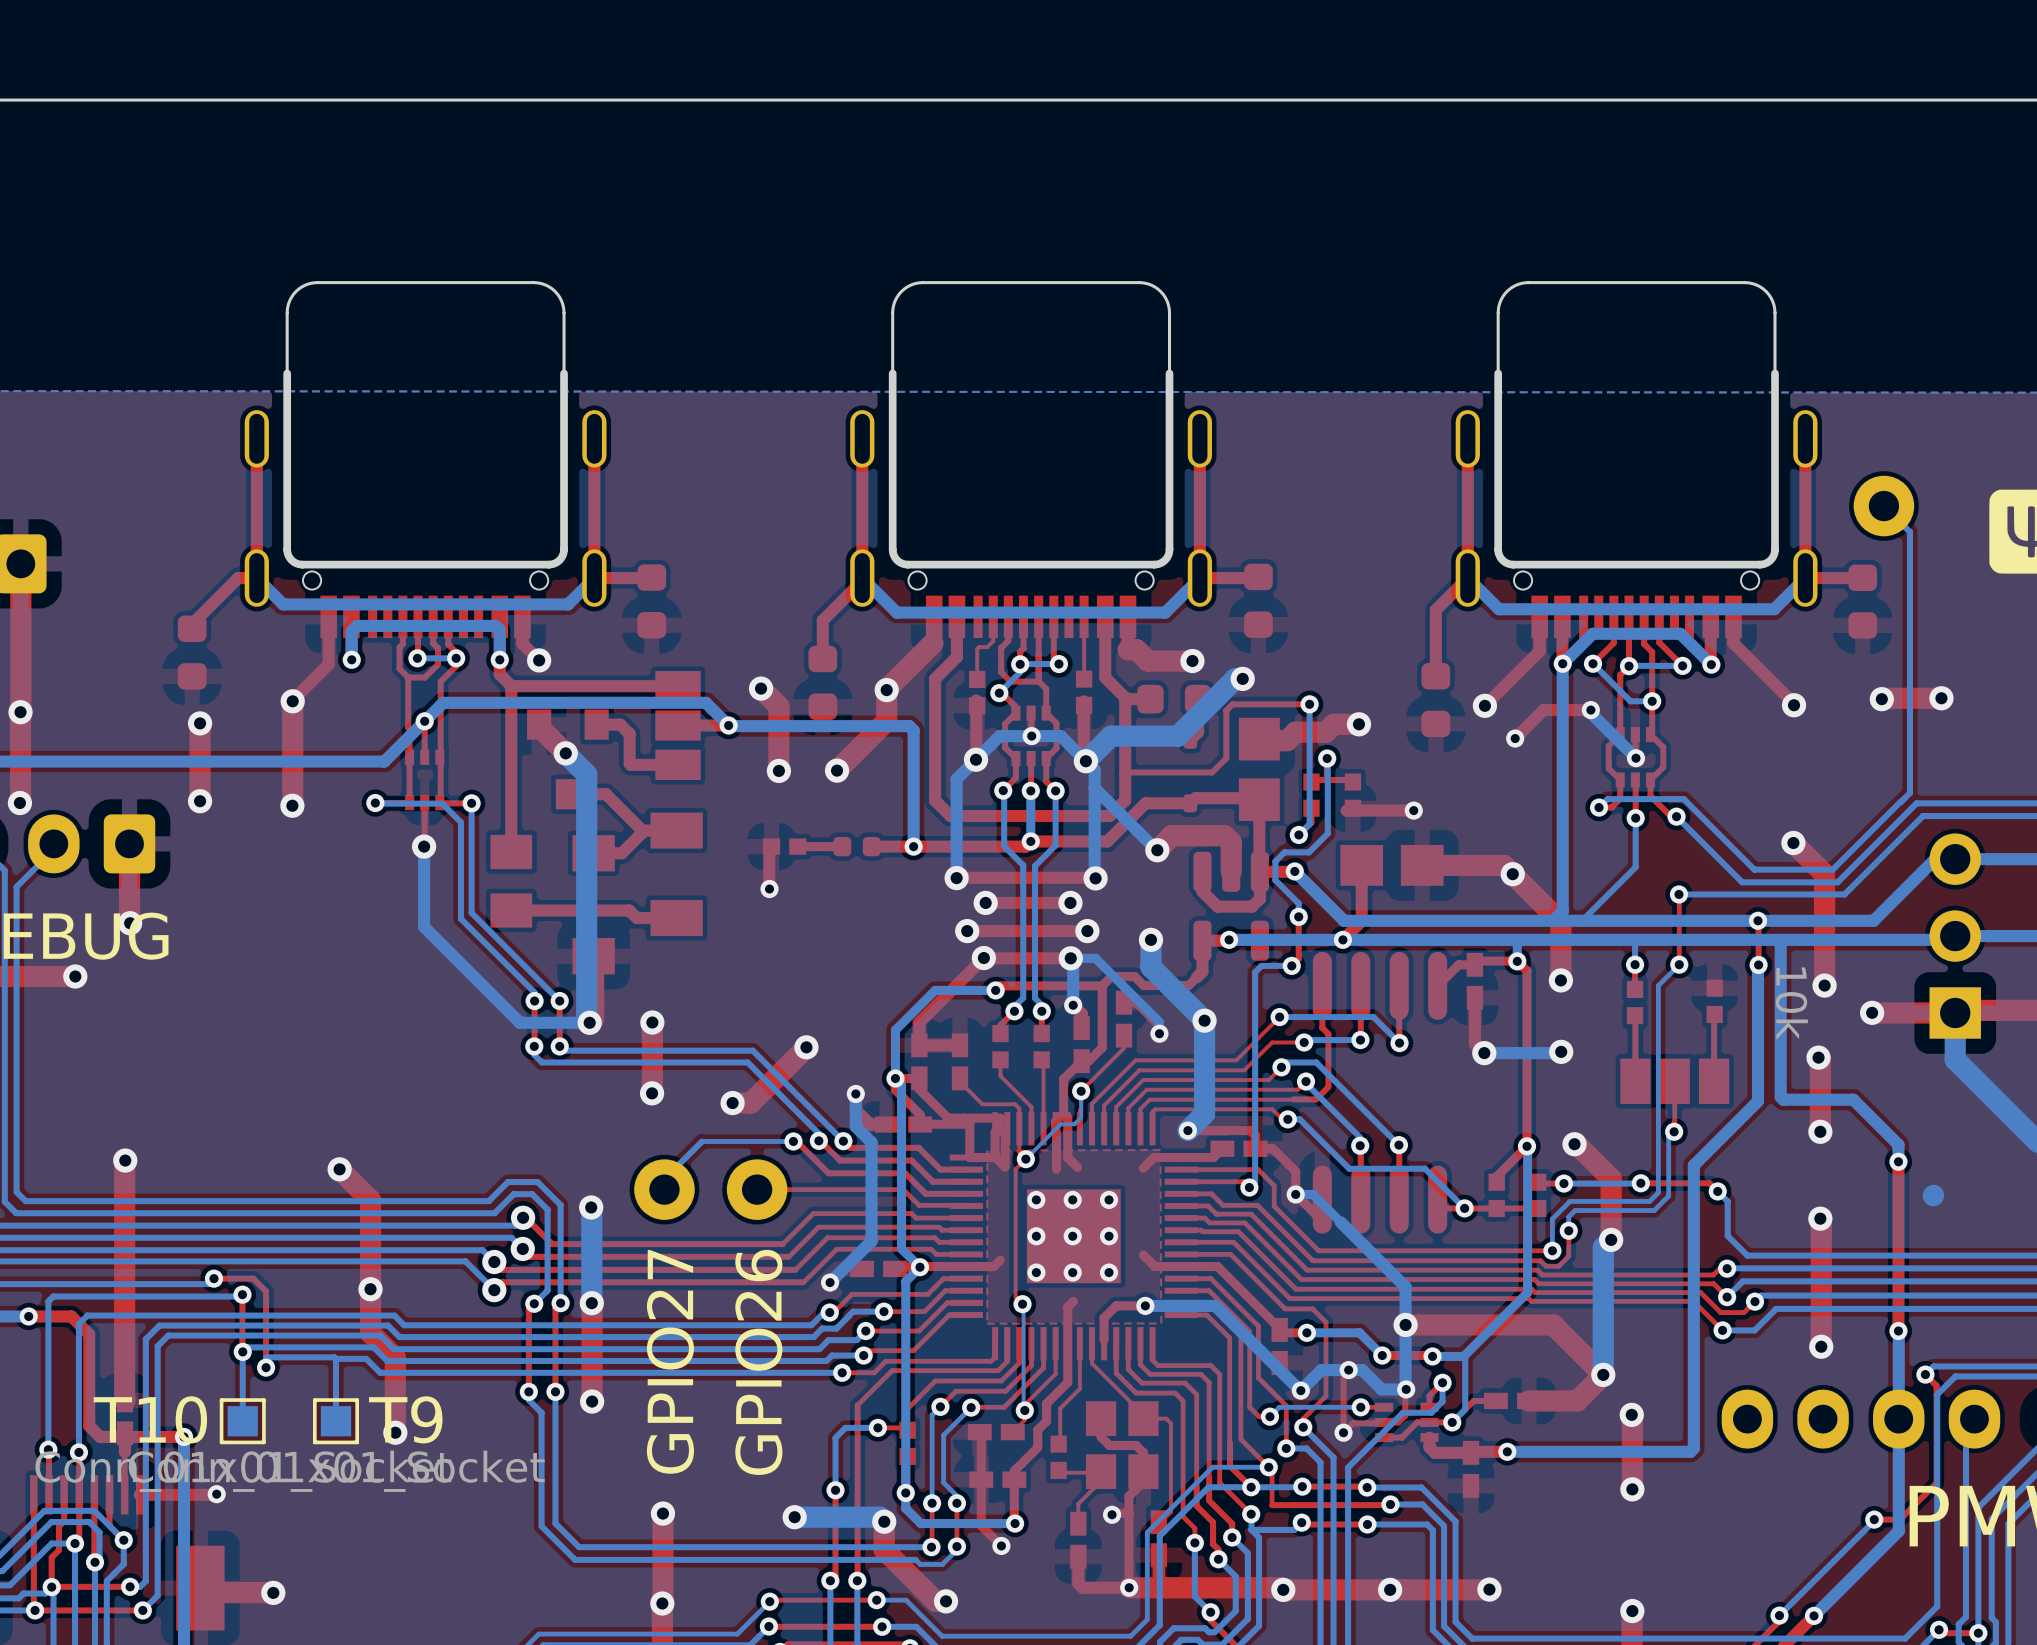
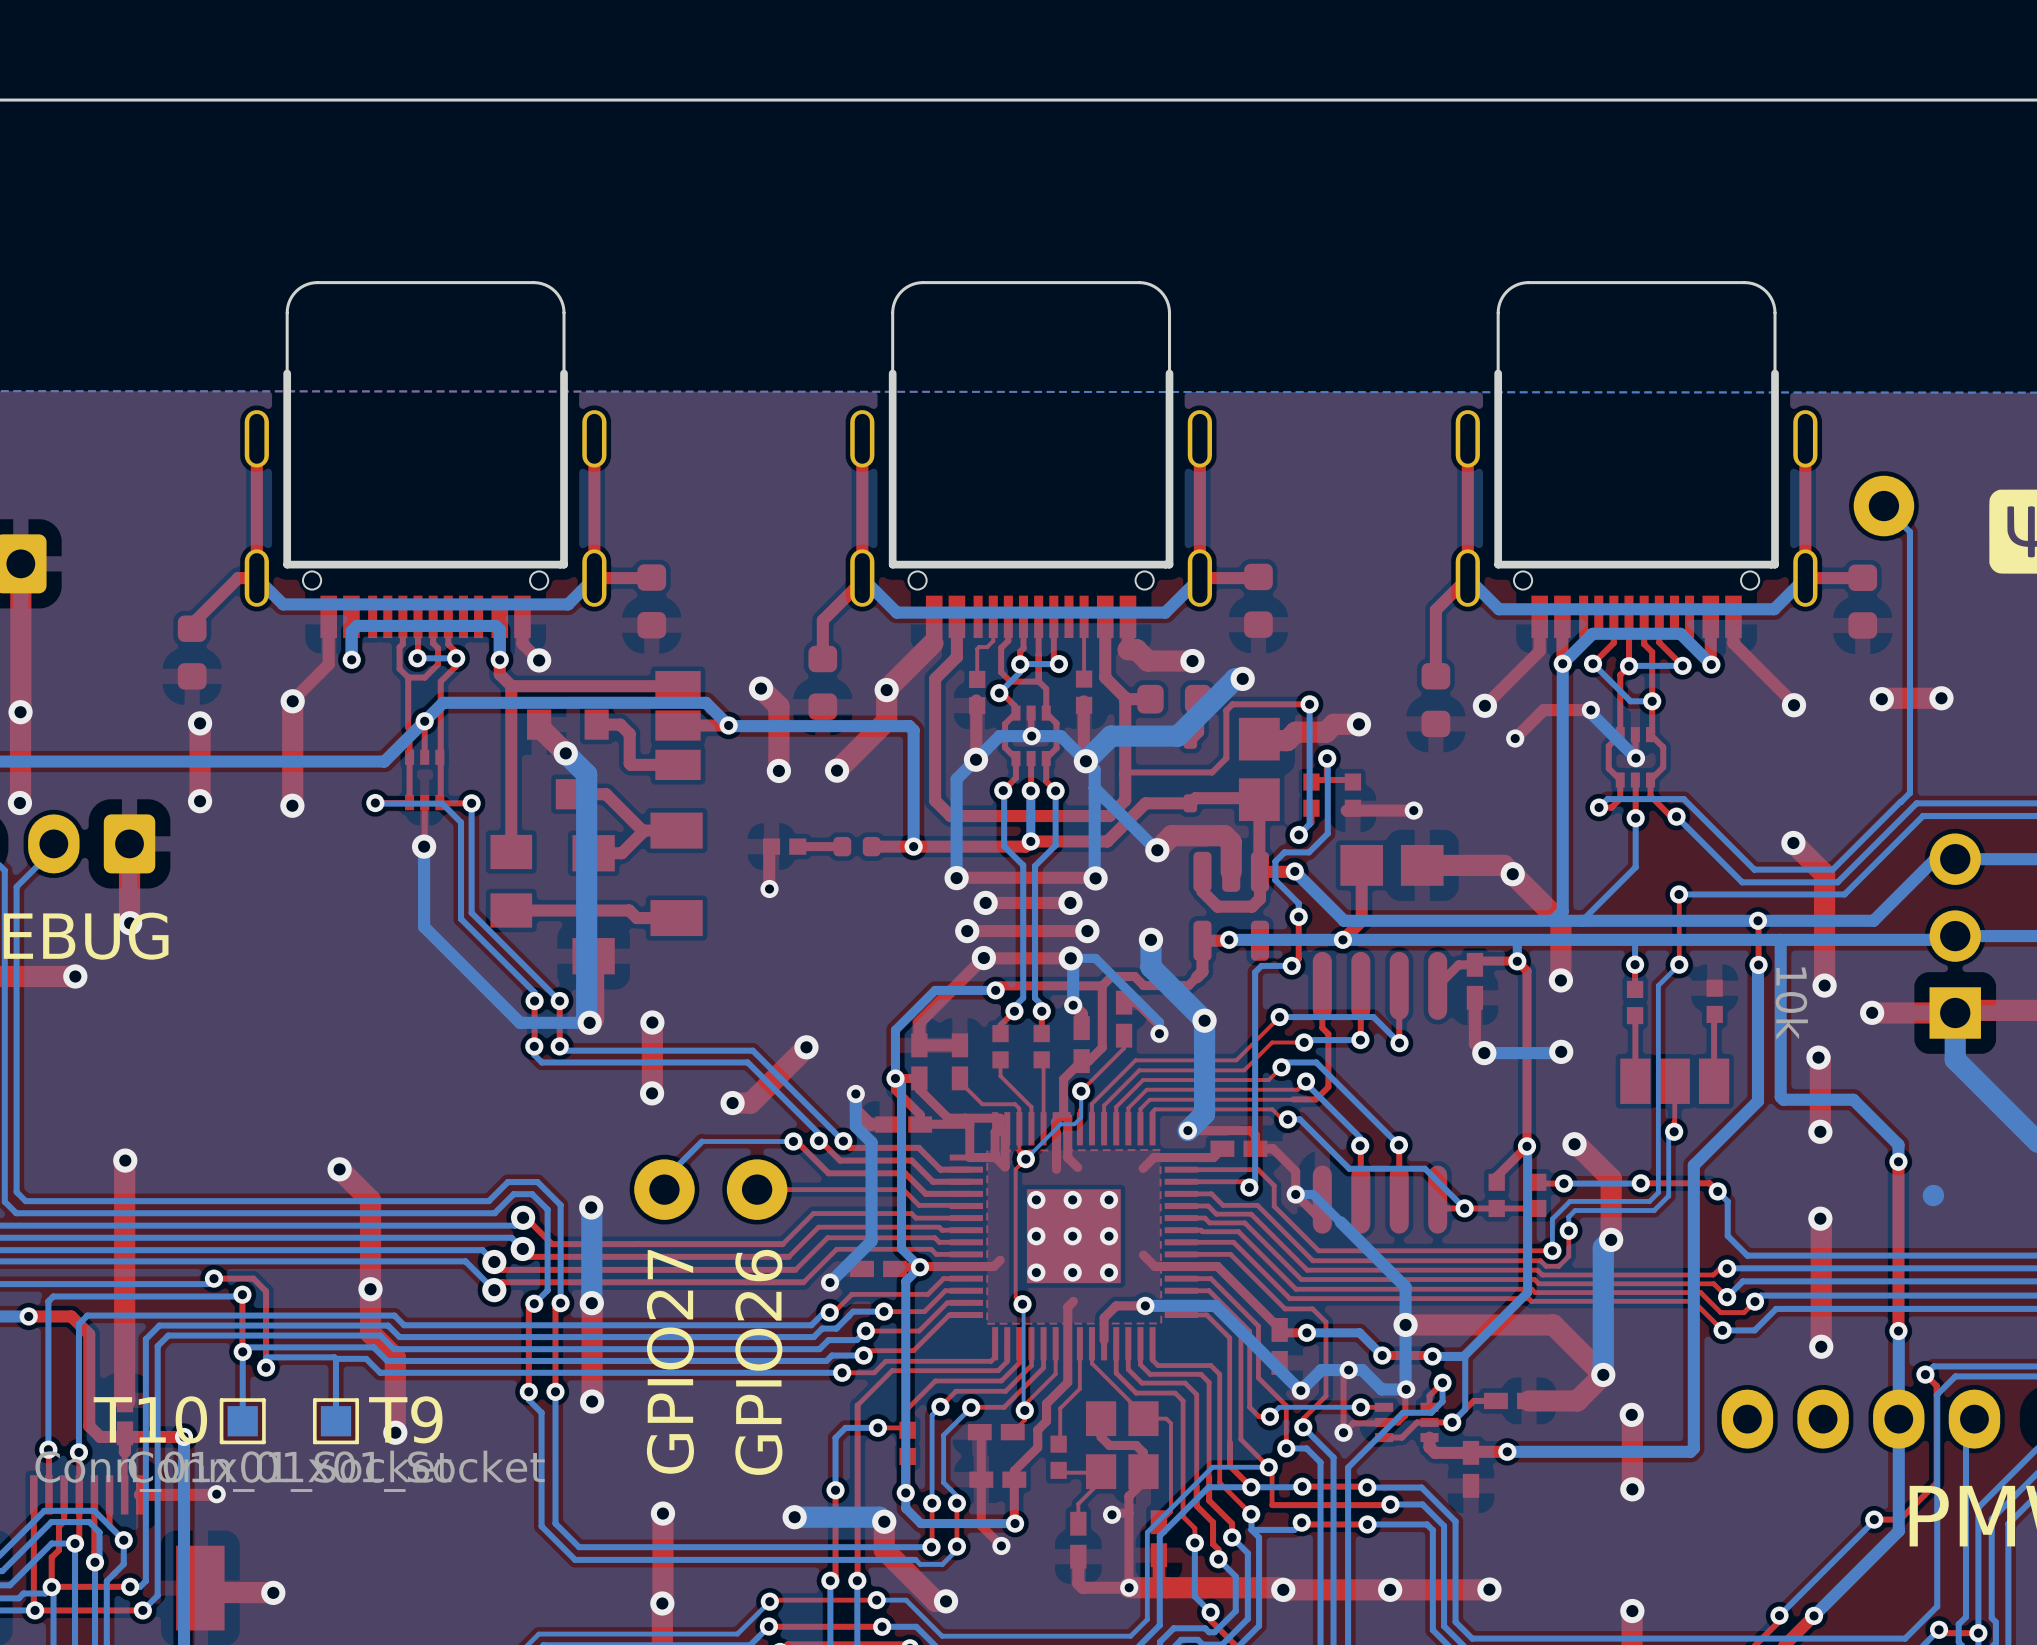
part footprint: [244, 369, 607, 639] -> [244, 369, 607, 639]
part footprint: [850, 369, 1212, 639] -> [850, 369, 1212, 639]
part footprint: [1455, 369, 1818, 639] -> [1455, 369, 1818, 639]

